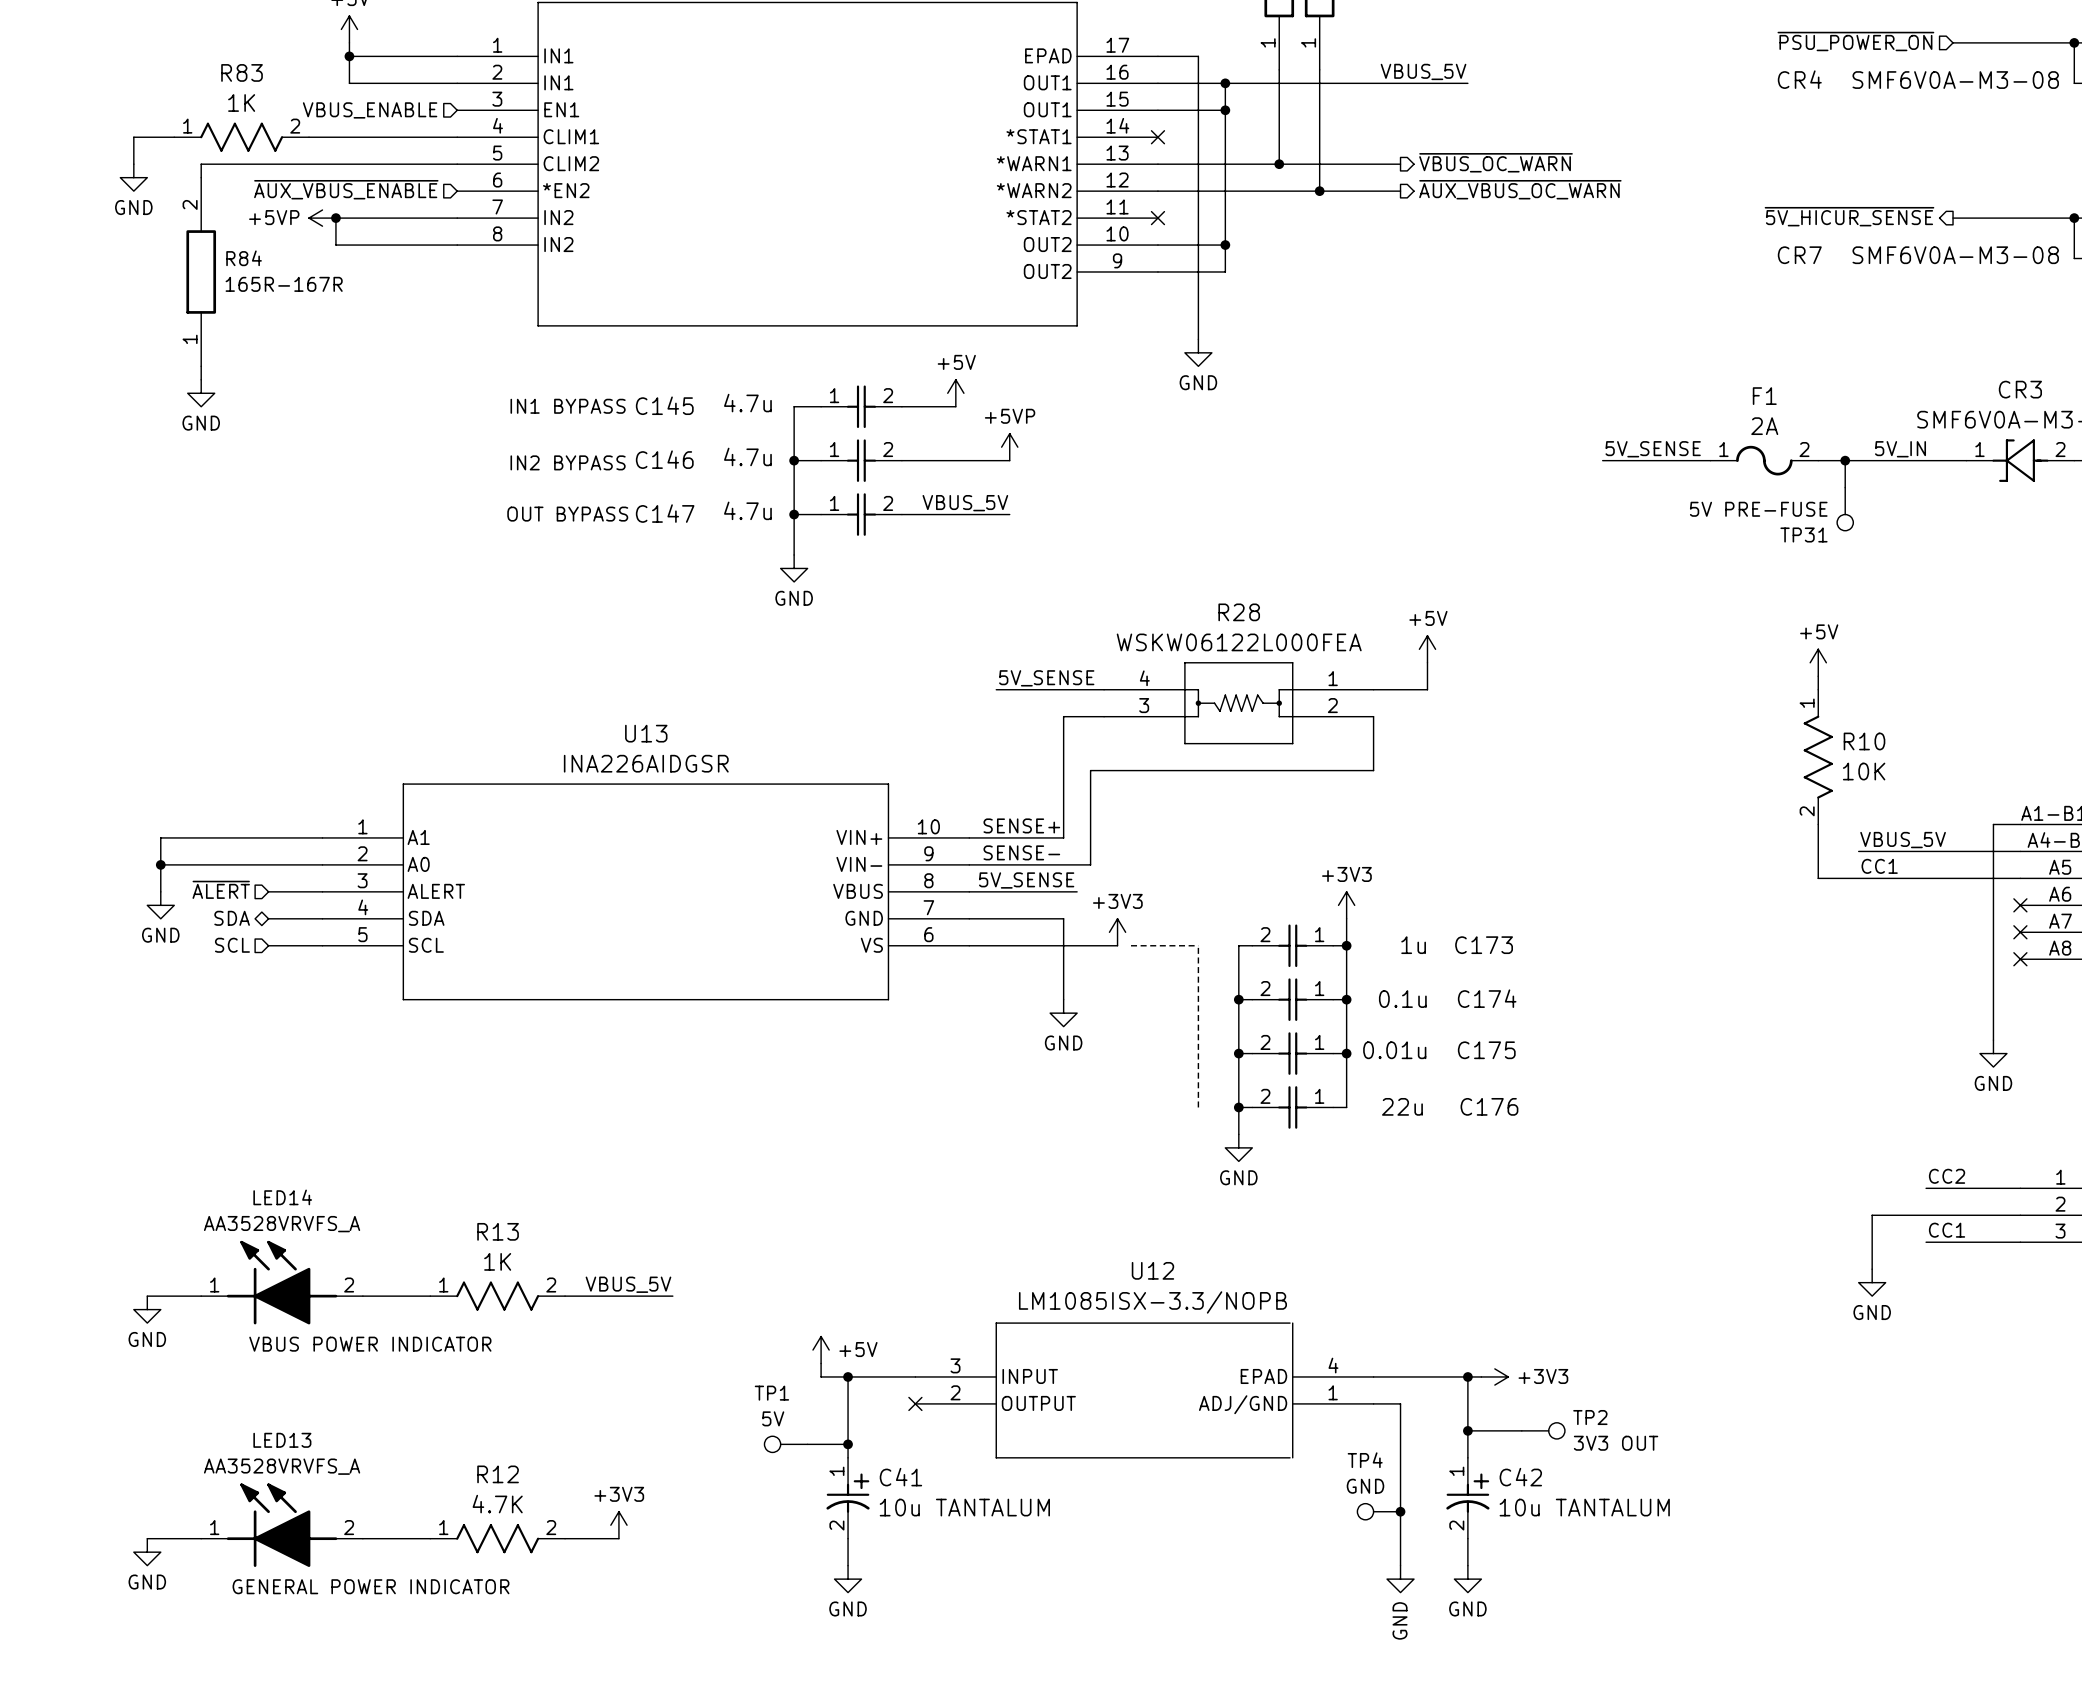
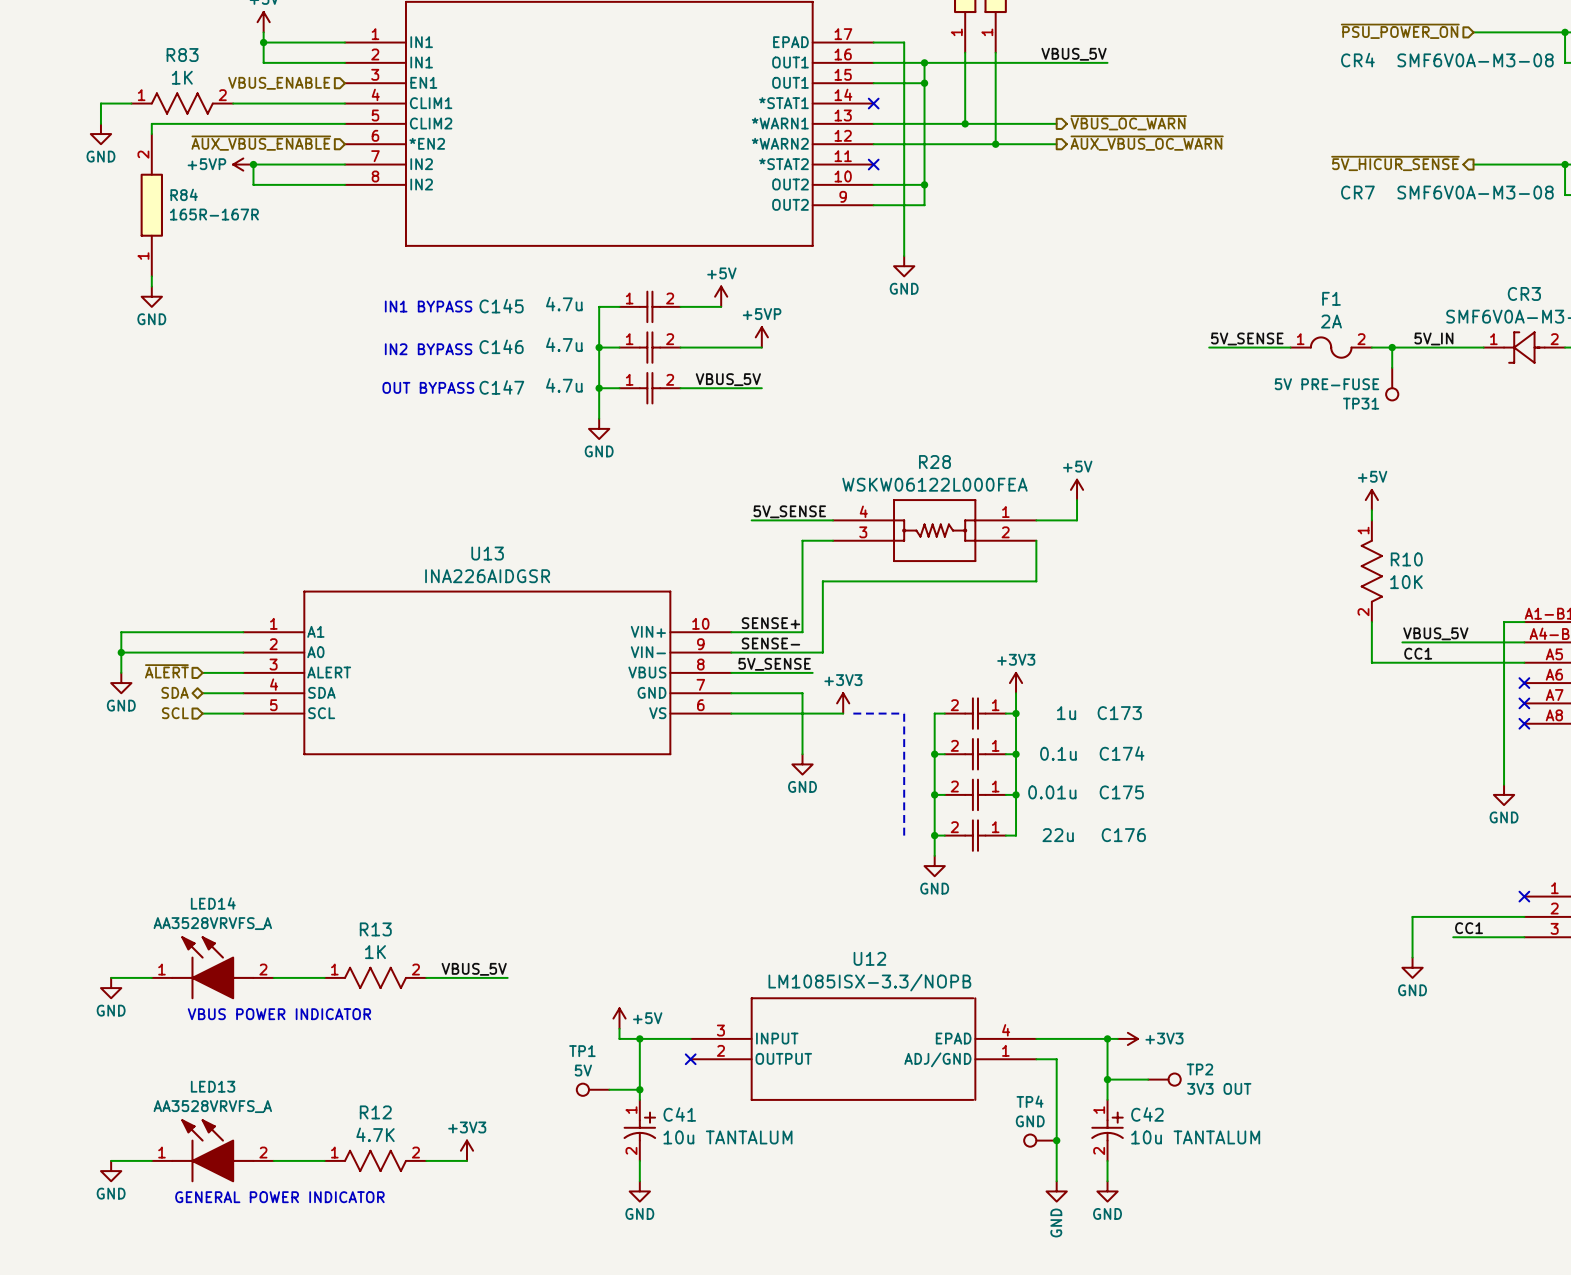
label: CC2 (1947, 1176) -> none
wire: (1926, 1188) (2020, 1188) -> none
no-connect mark: none -> (1524, 896)

